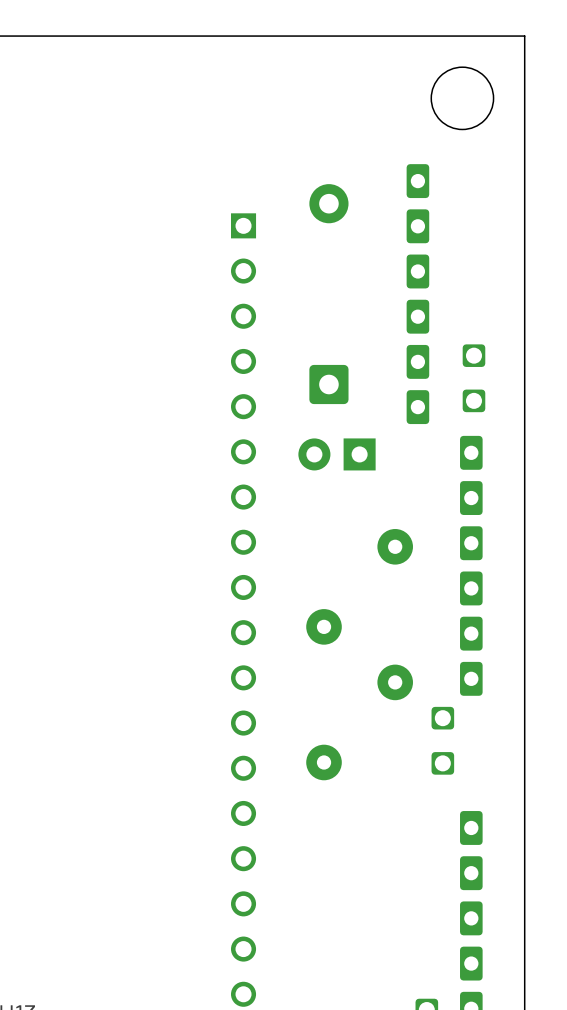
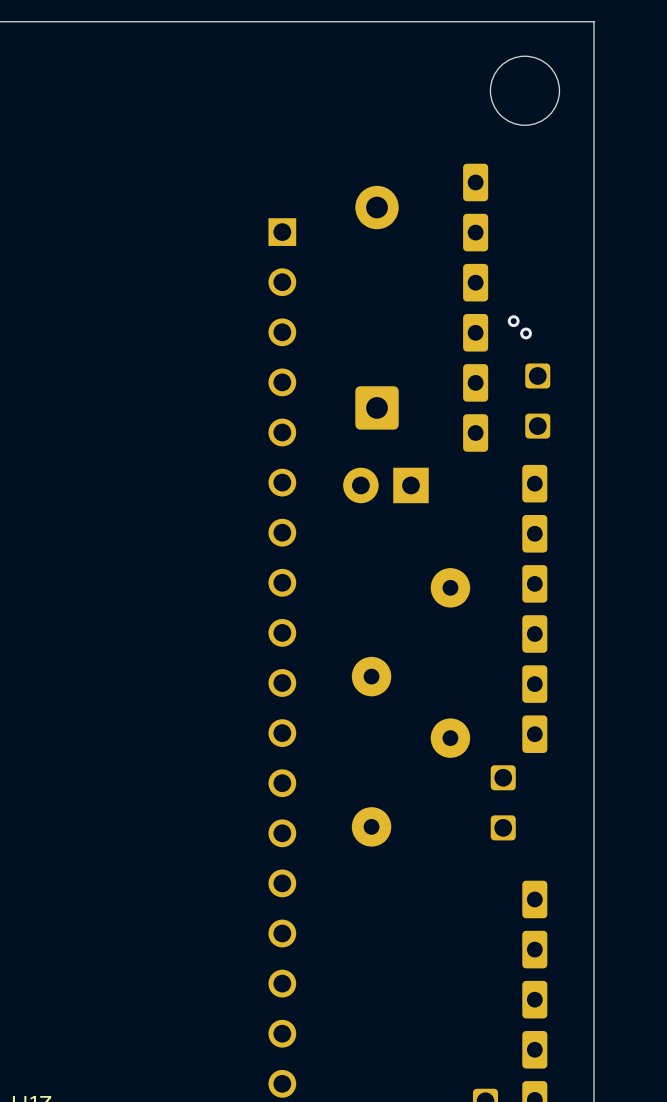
via: none -> (513, 321)
via: none -> (526, 333)

